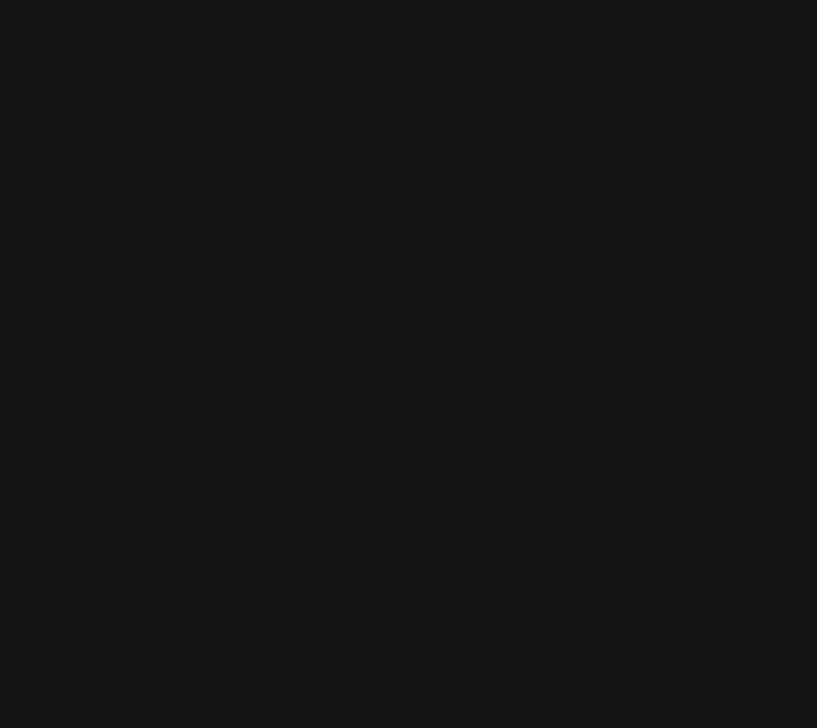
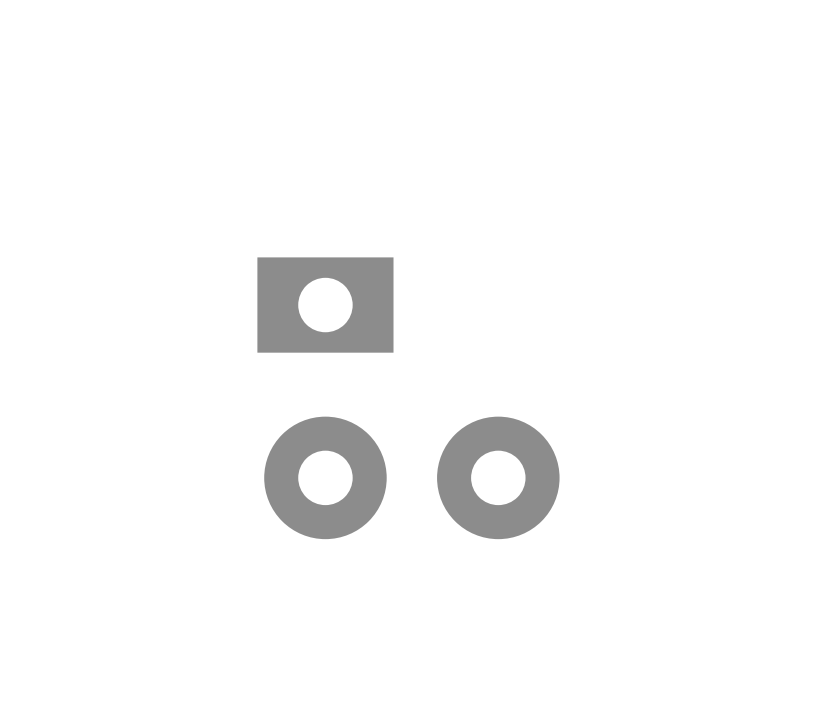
part: none -> (408, 398)

